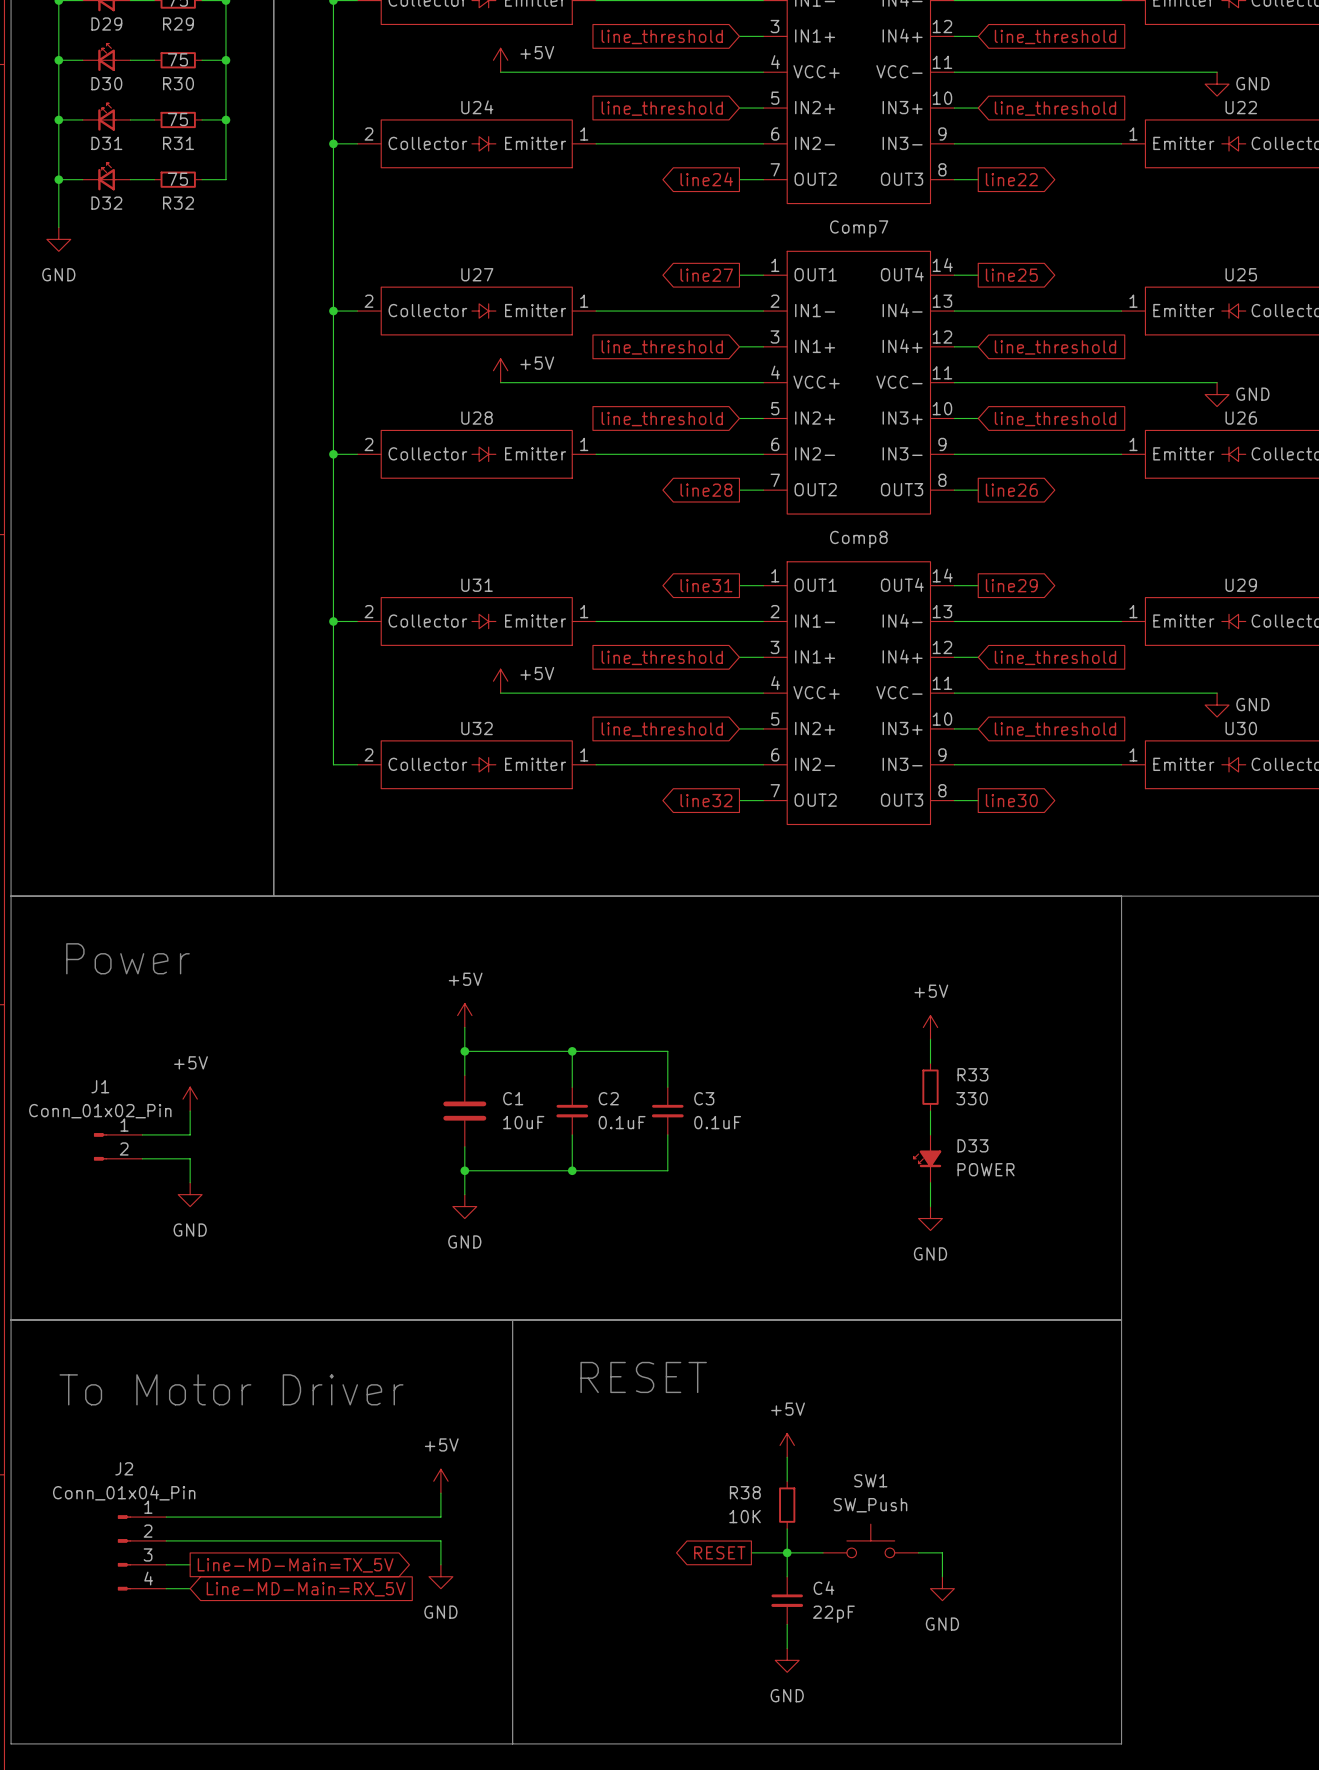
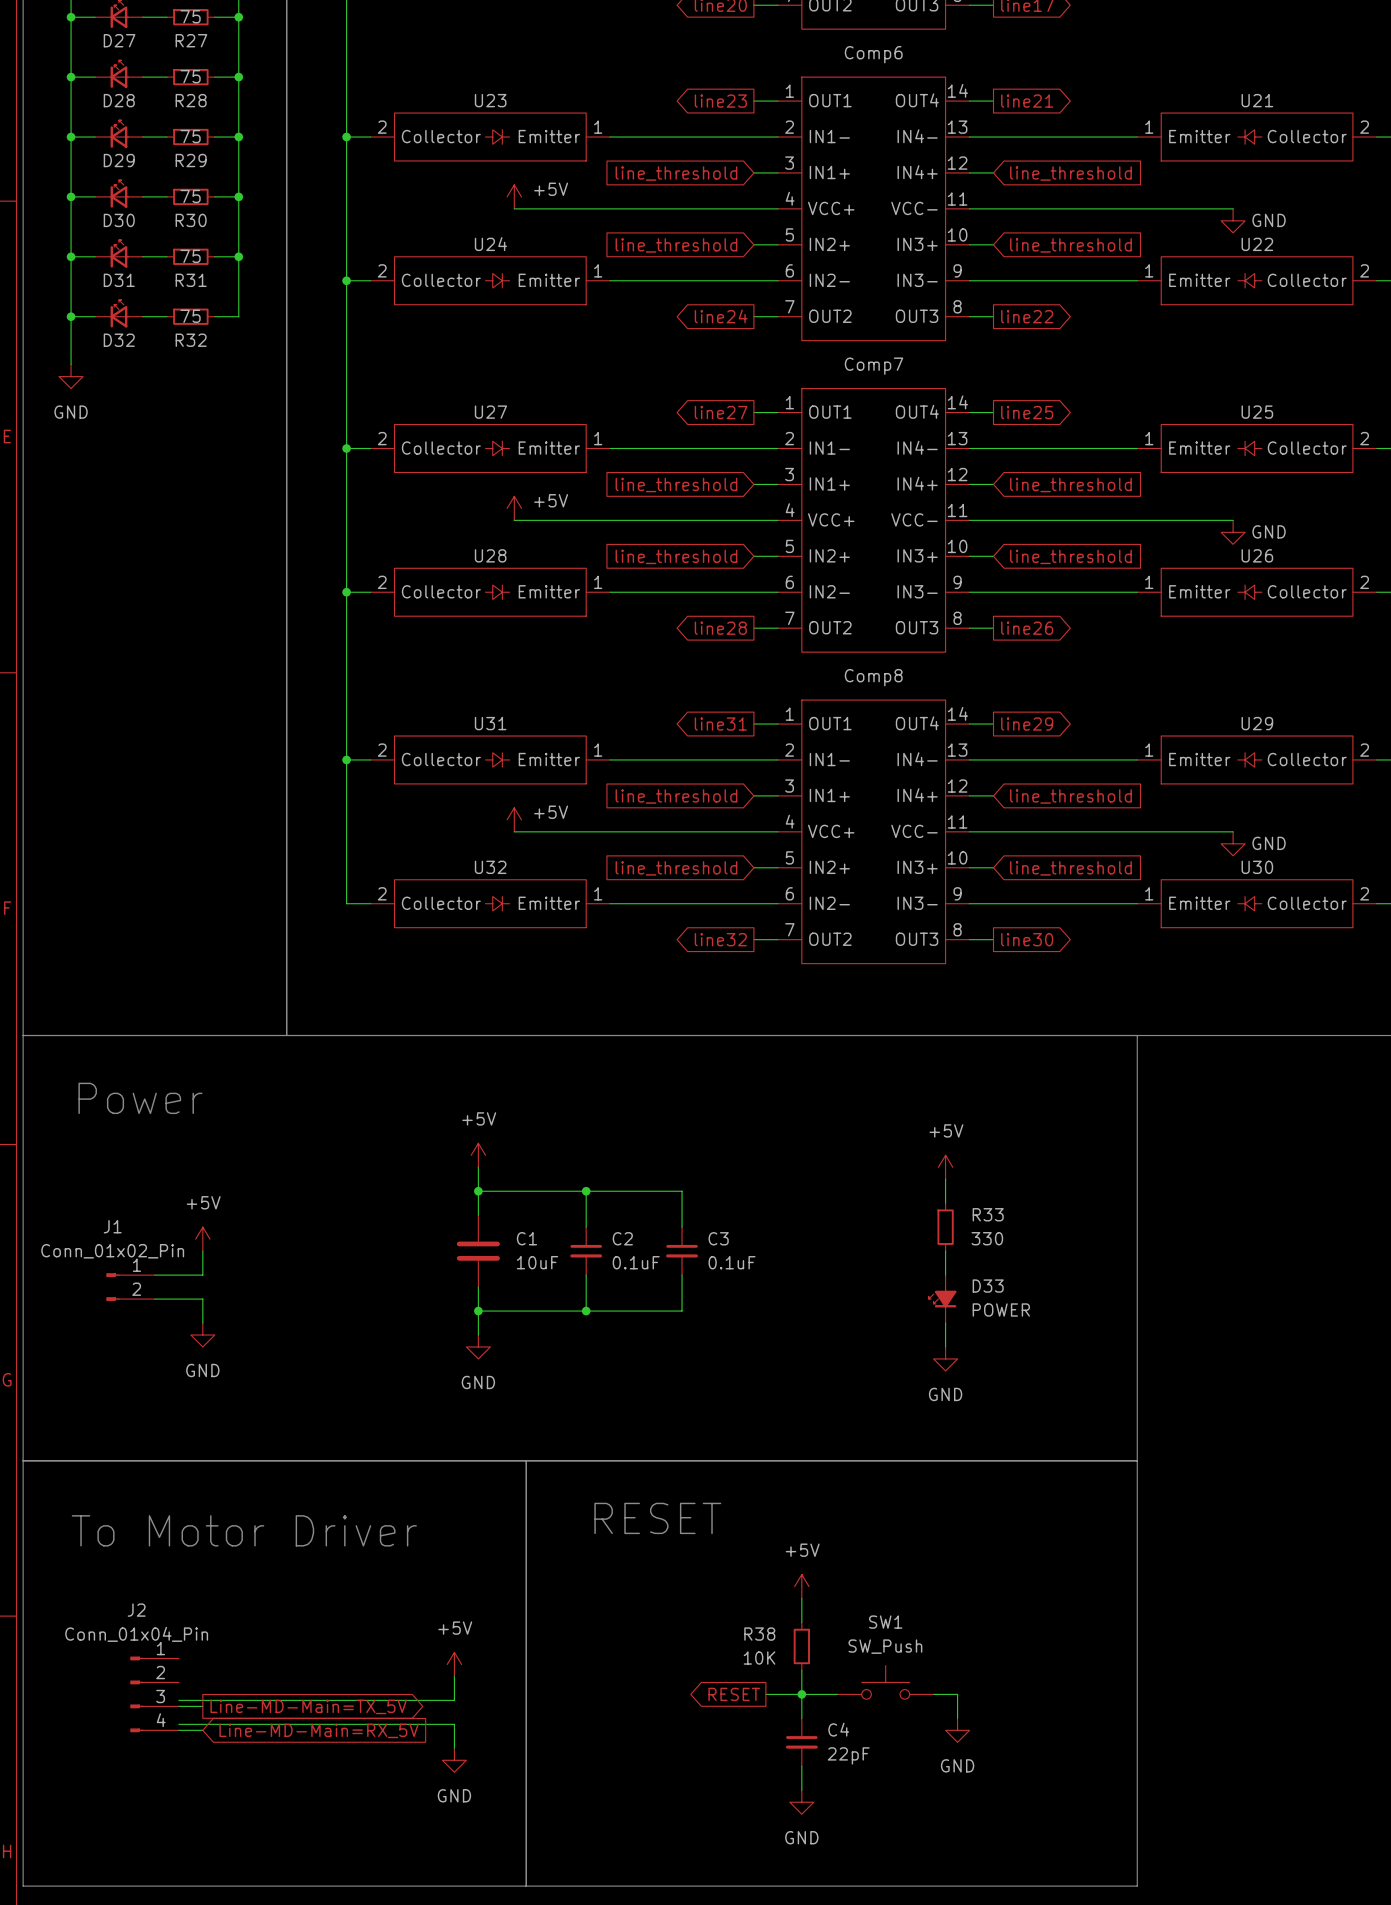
power symbol position: +5V (440, 1481) -> +5V (454, 1664)
wire: (440, 1493) (440, 1517) (166, 1517) -> none
wire: (166, 1540) (440, 1540) -> (454, 1676) (454, 1682)
wire: (440, 1558) (440, 1564) -> (454, 1700) (178, 1700)
power symbol position: GND (440, 1576) -> GND (454, 1760)
wire: none -> (178, 1724) (454, 1724) (454, 1748)

